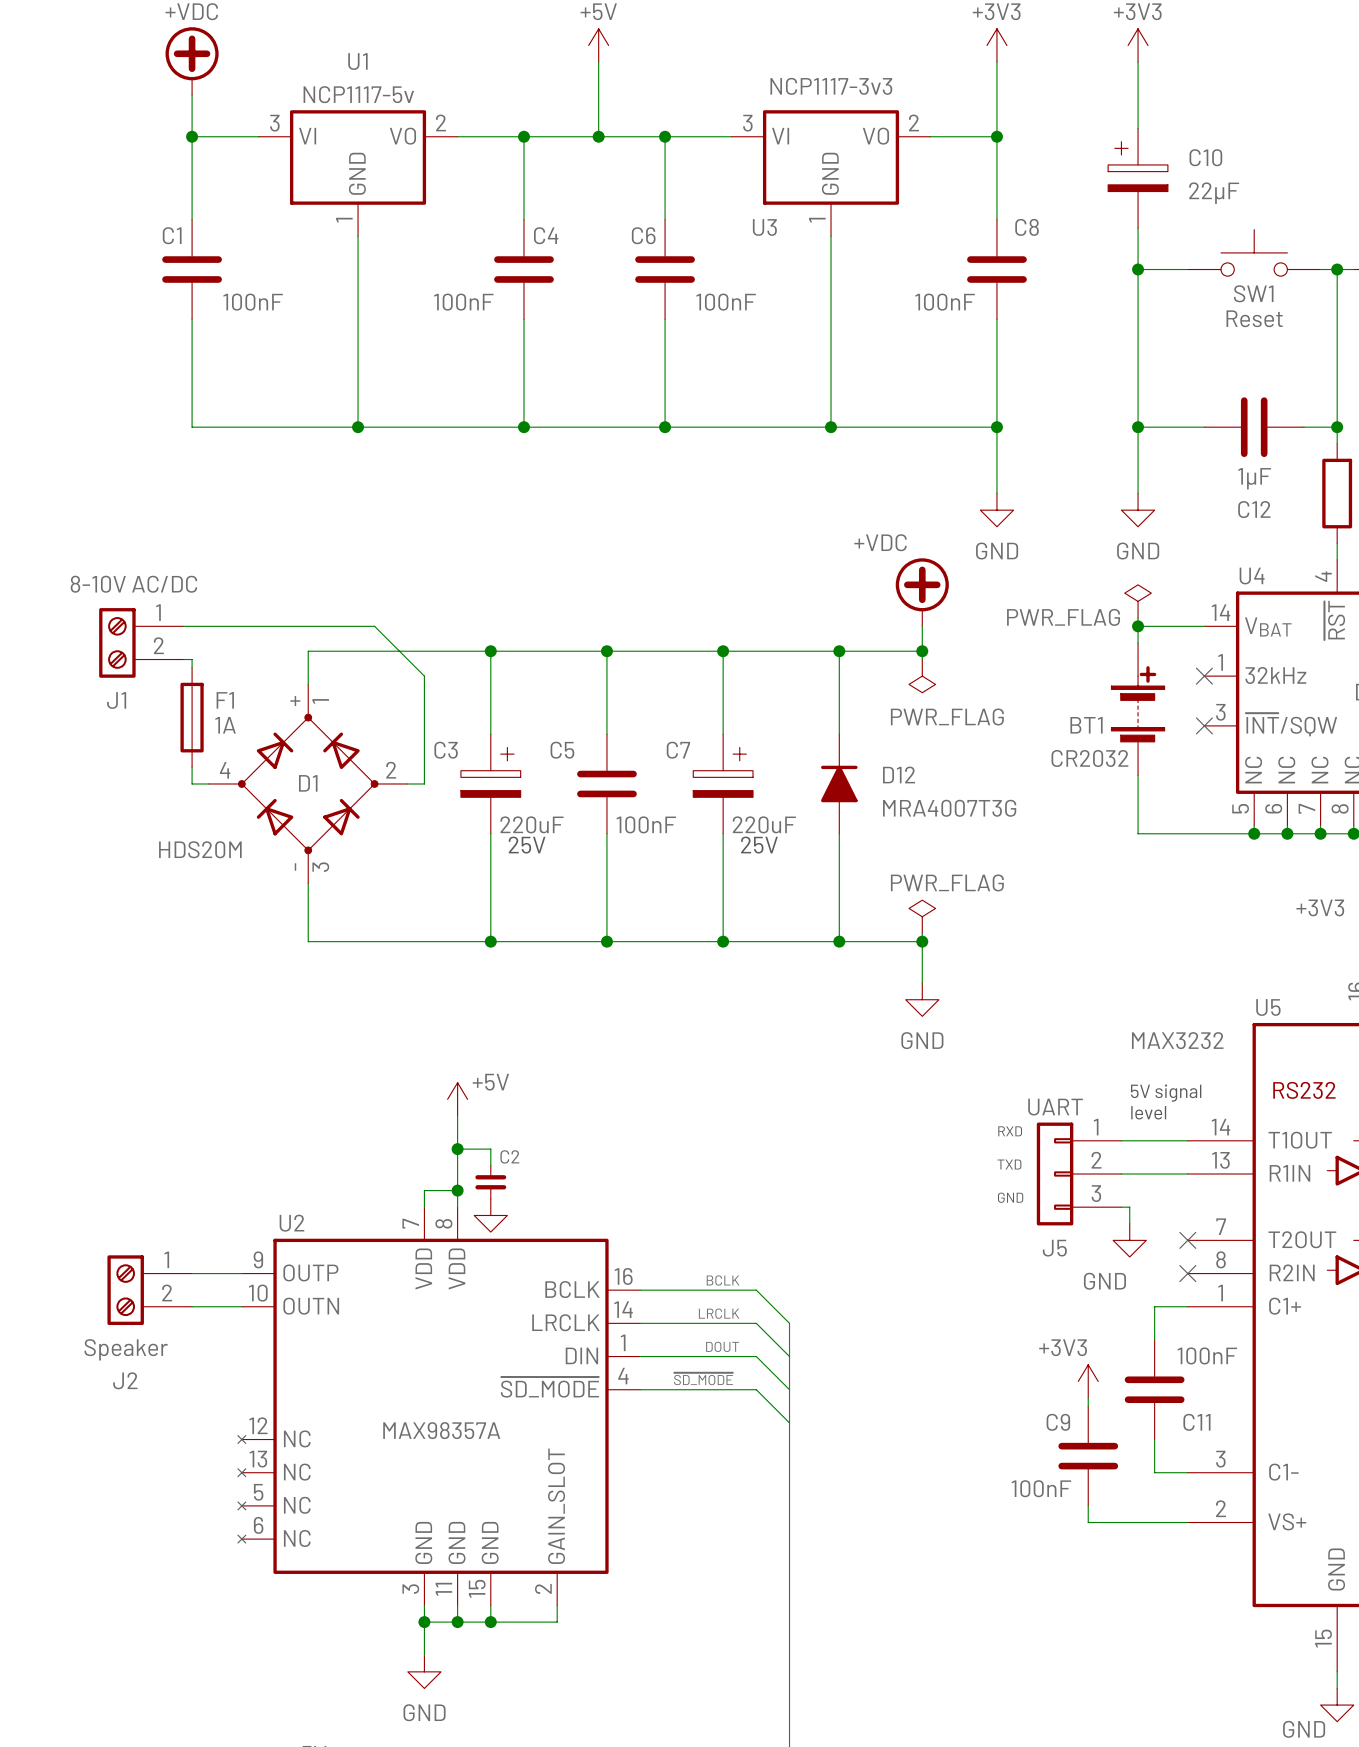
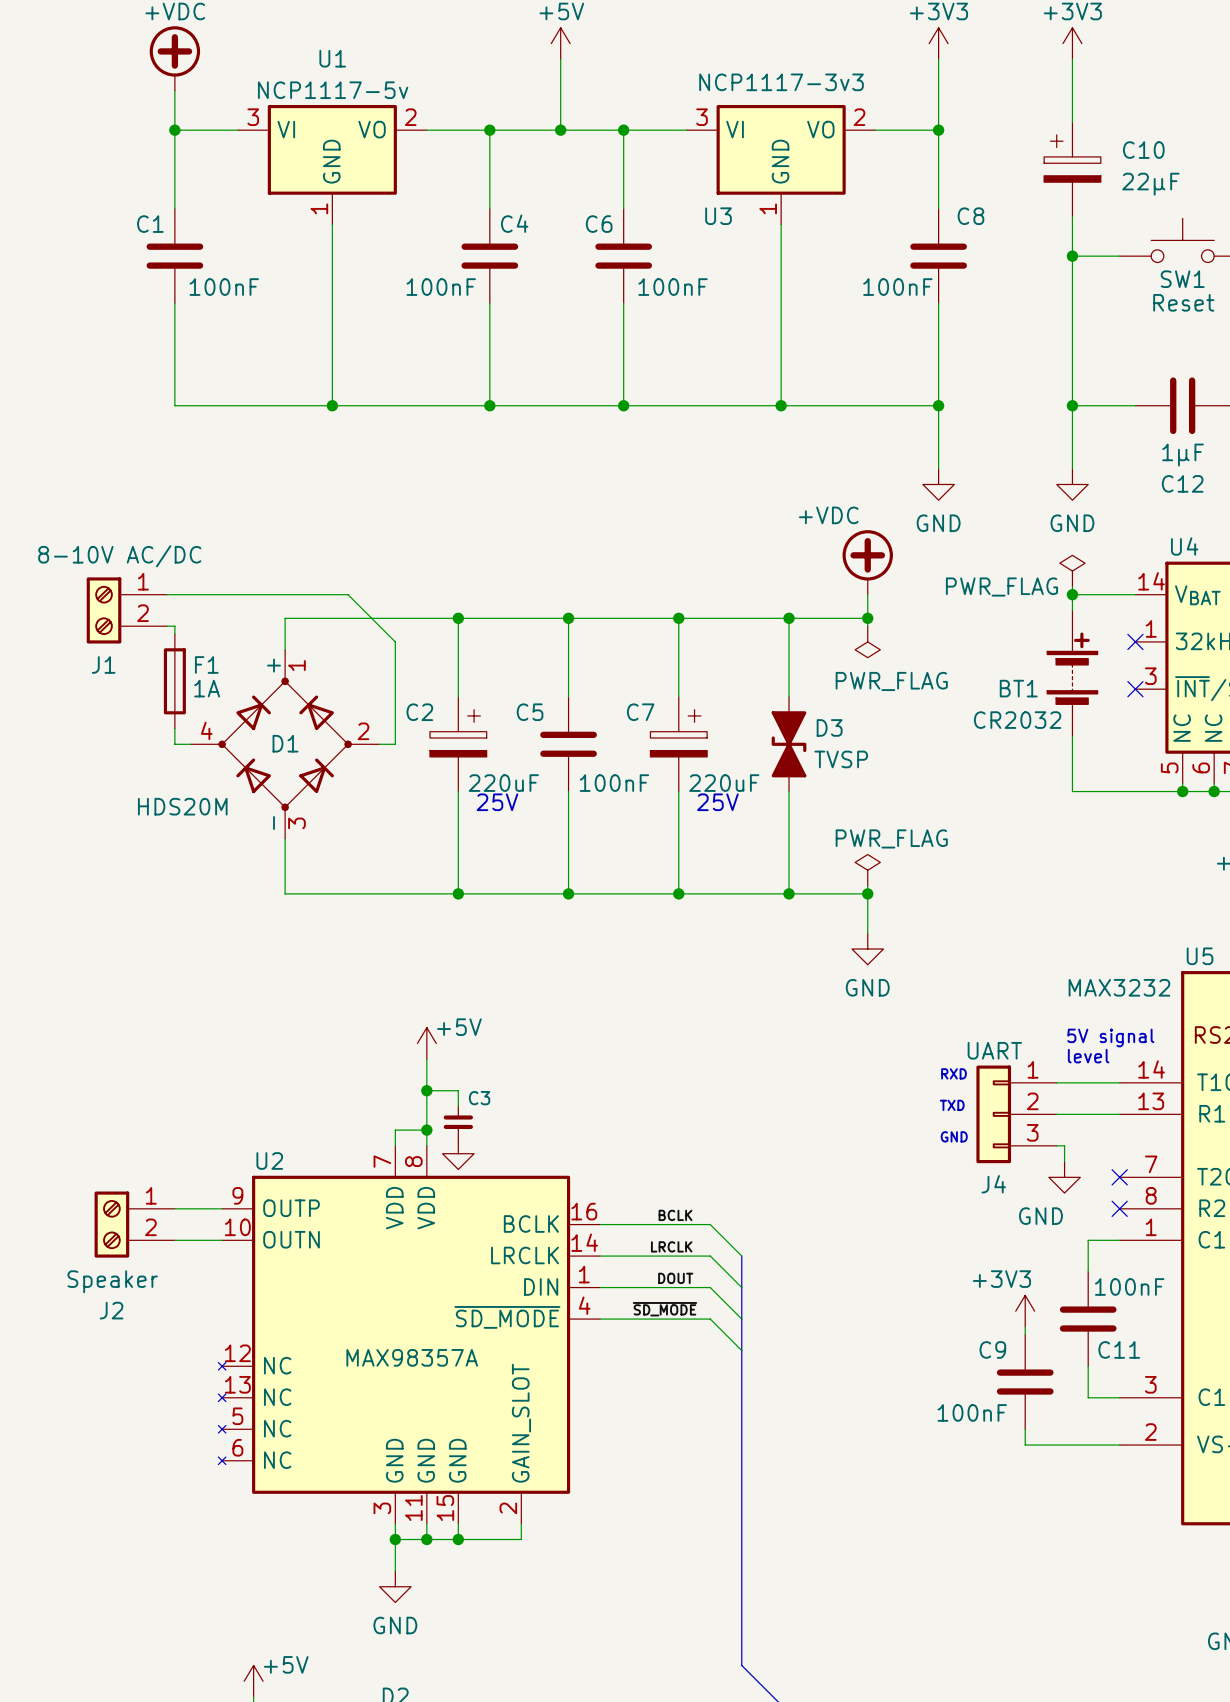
C3 name: C3 (446, 750) -> C2 (419, 712)
D12: MRA4007T3G (839, 783) -> none
D3: none -> TVSP (789, 744)
C2 name: C2 (509, 1156) -> C3 (479, 1098)
J5 name: J5 (1054, 1248) -> J4 (993, 1184)

